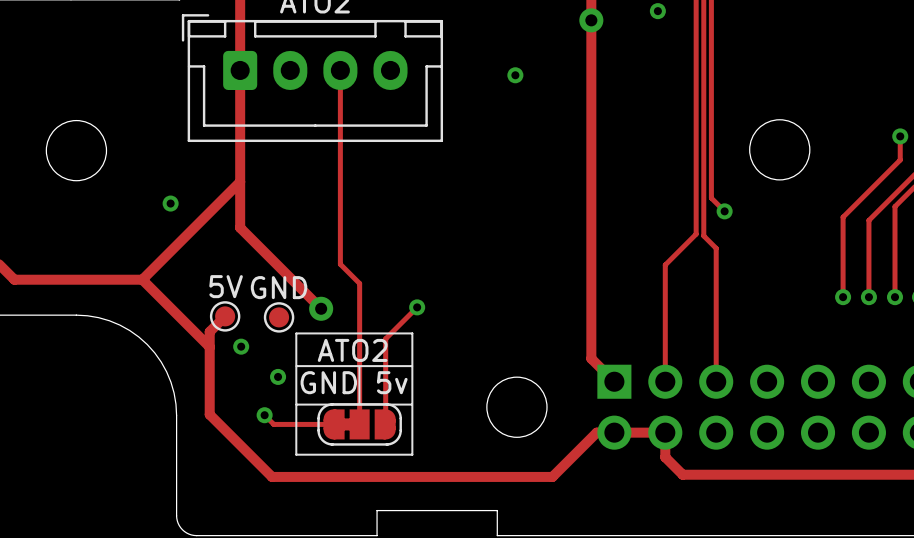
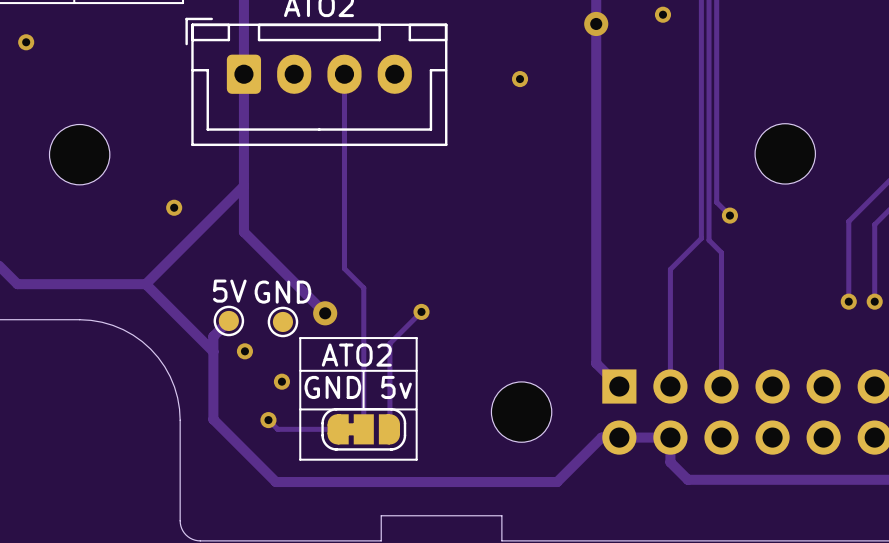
via: none -> (26, 42)

